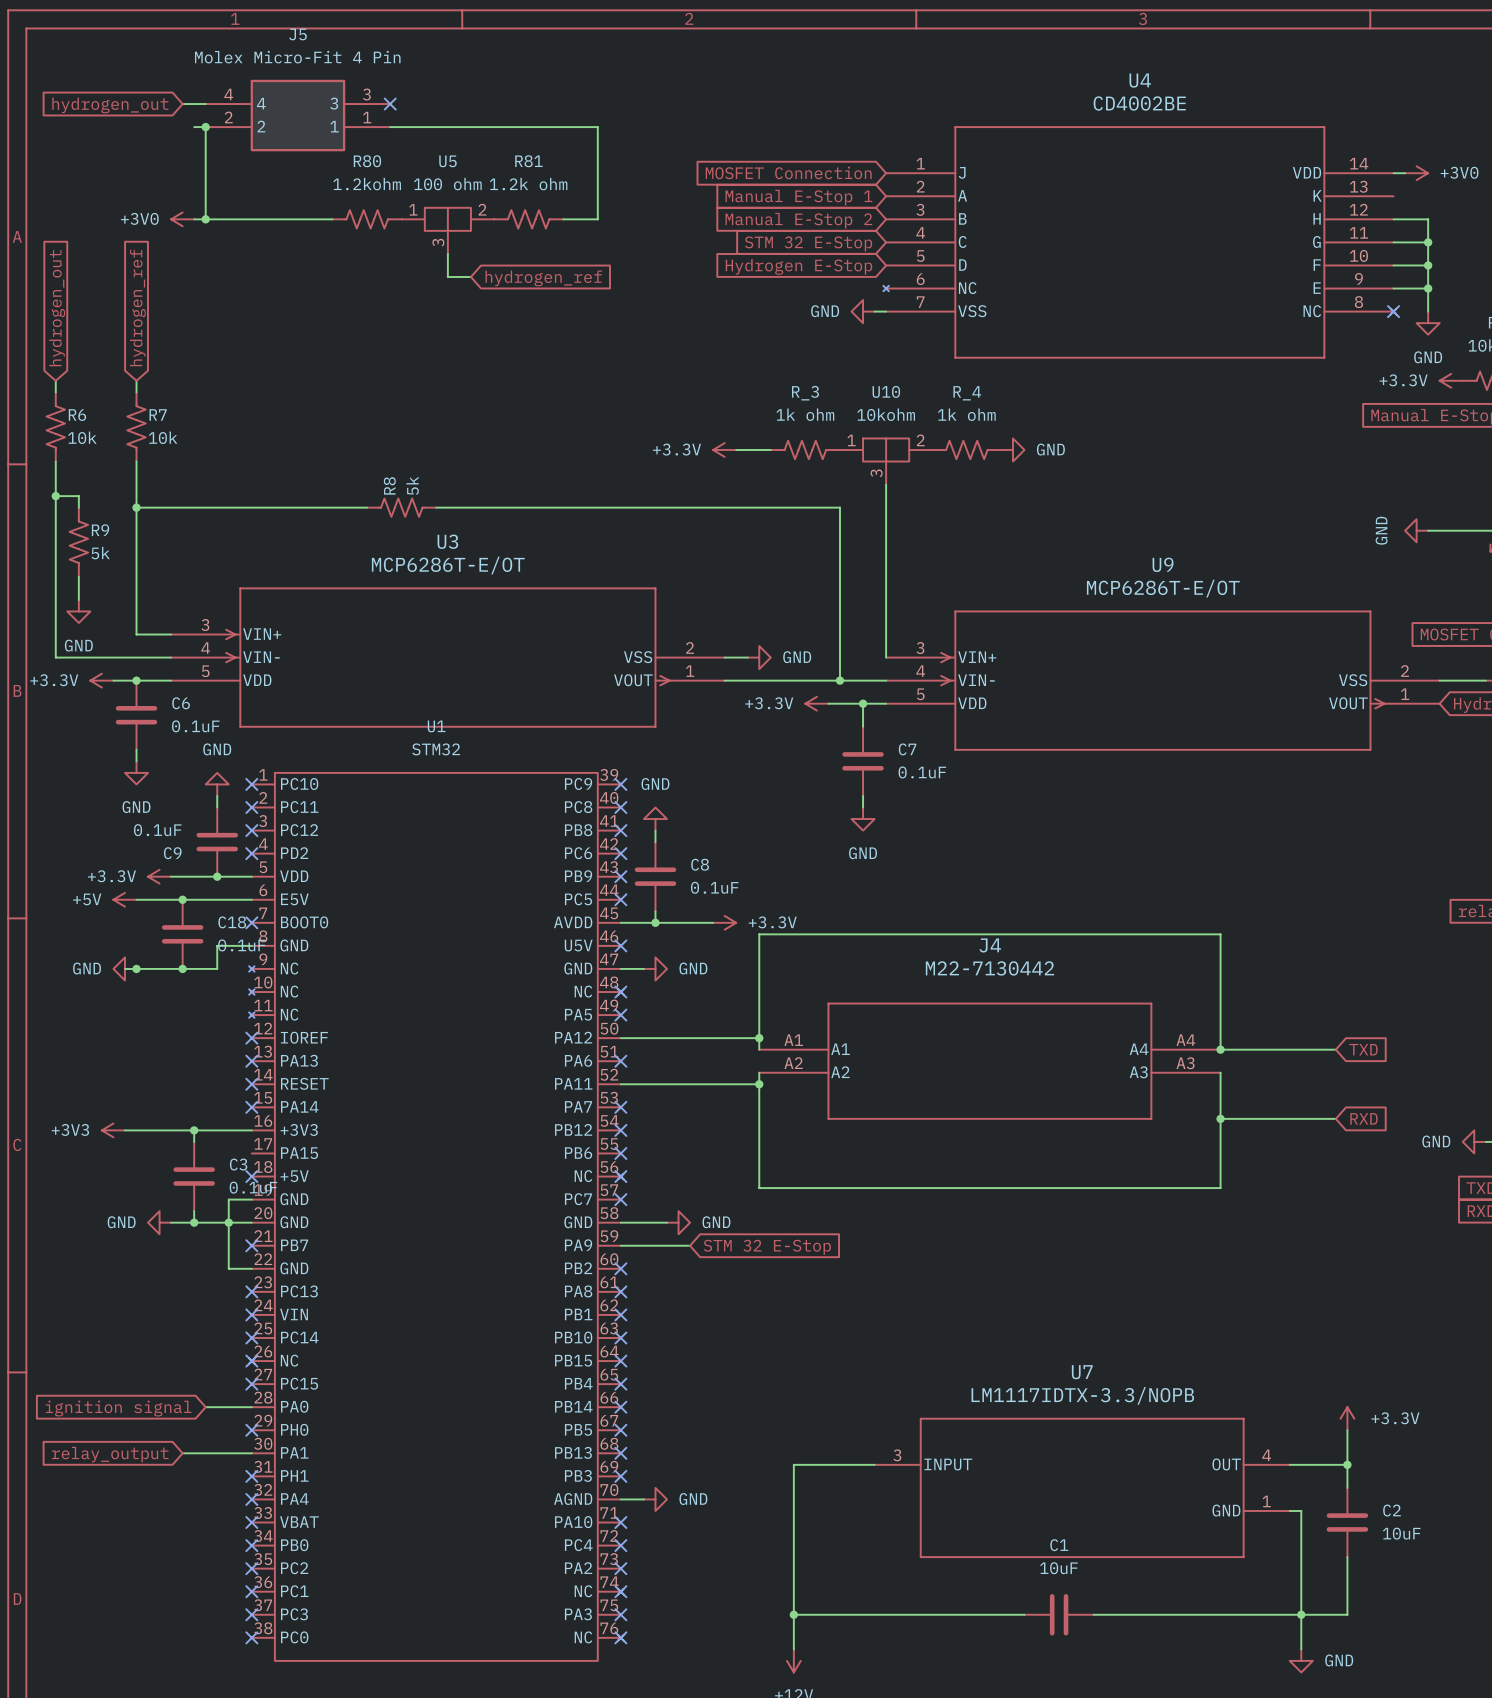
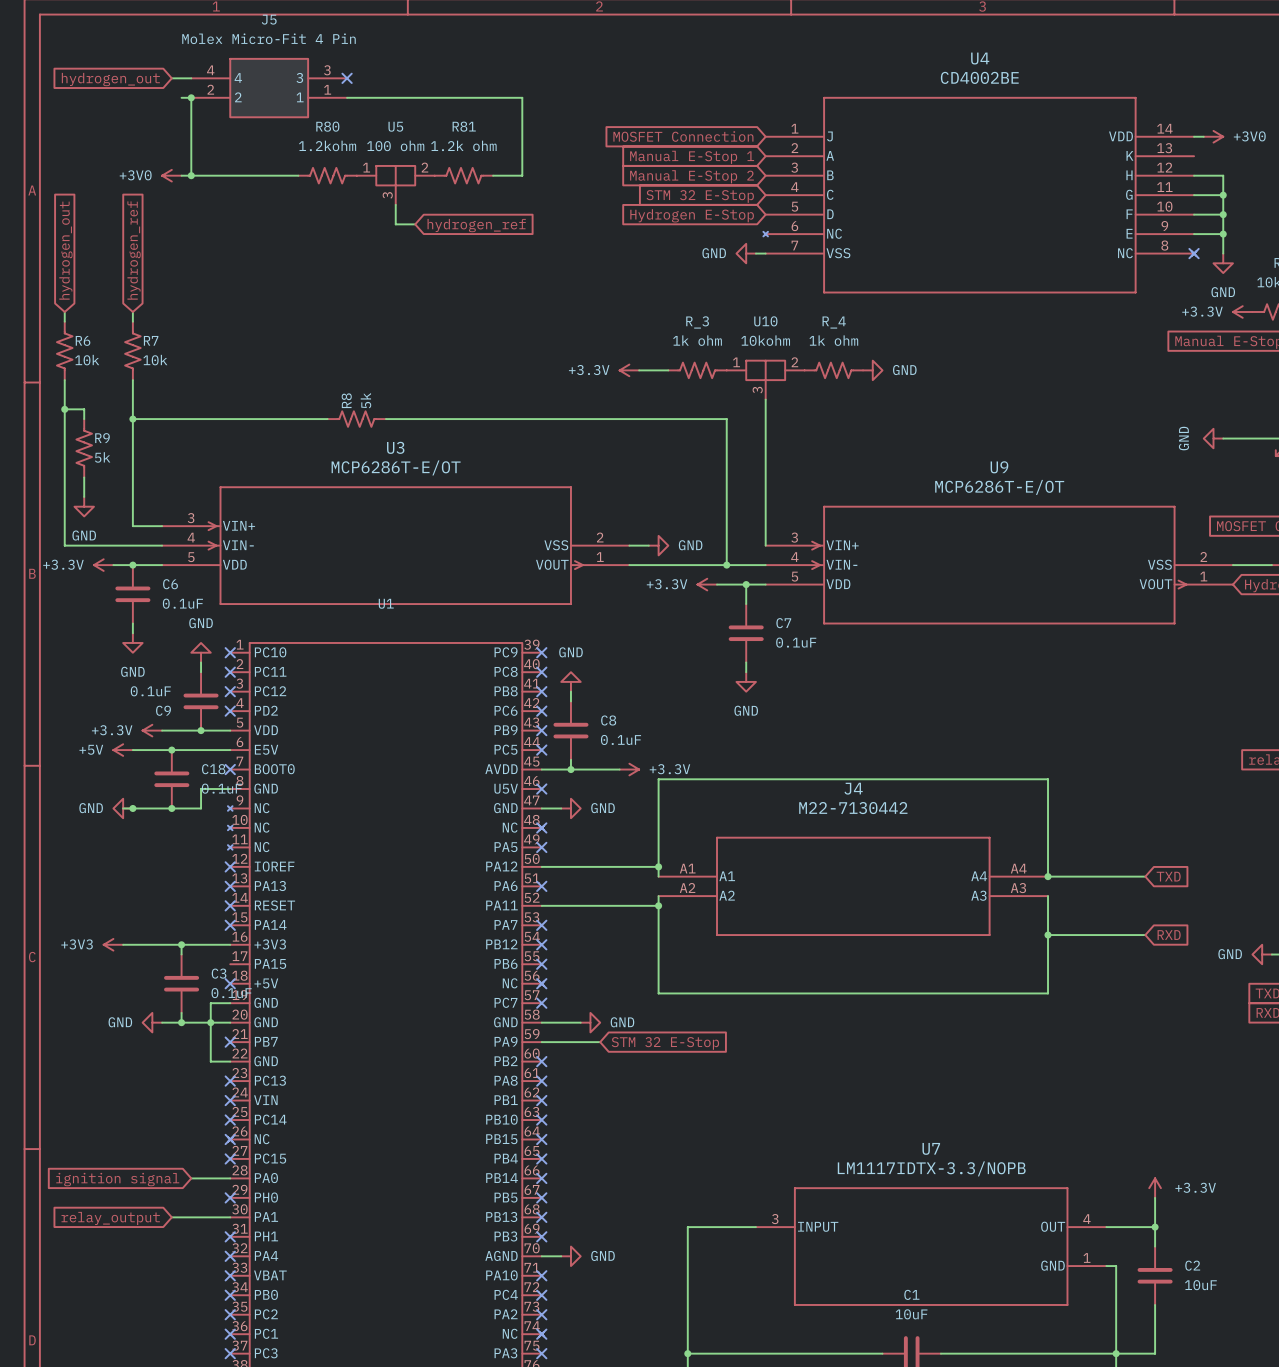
U1 value: STM32 (436, 749) -> none

